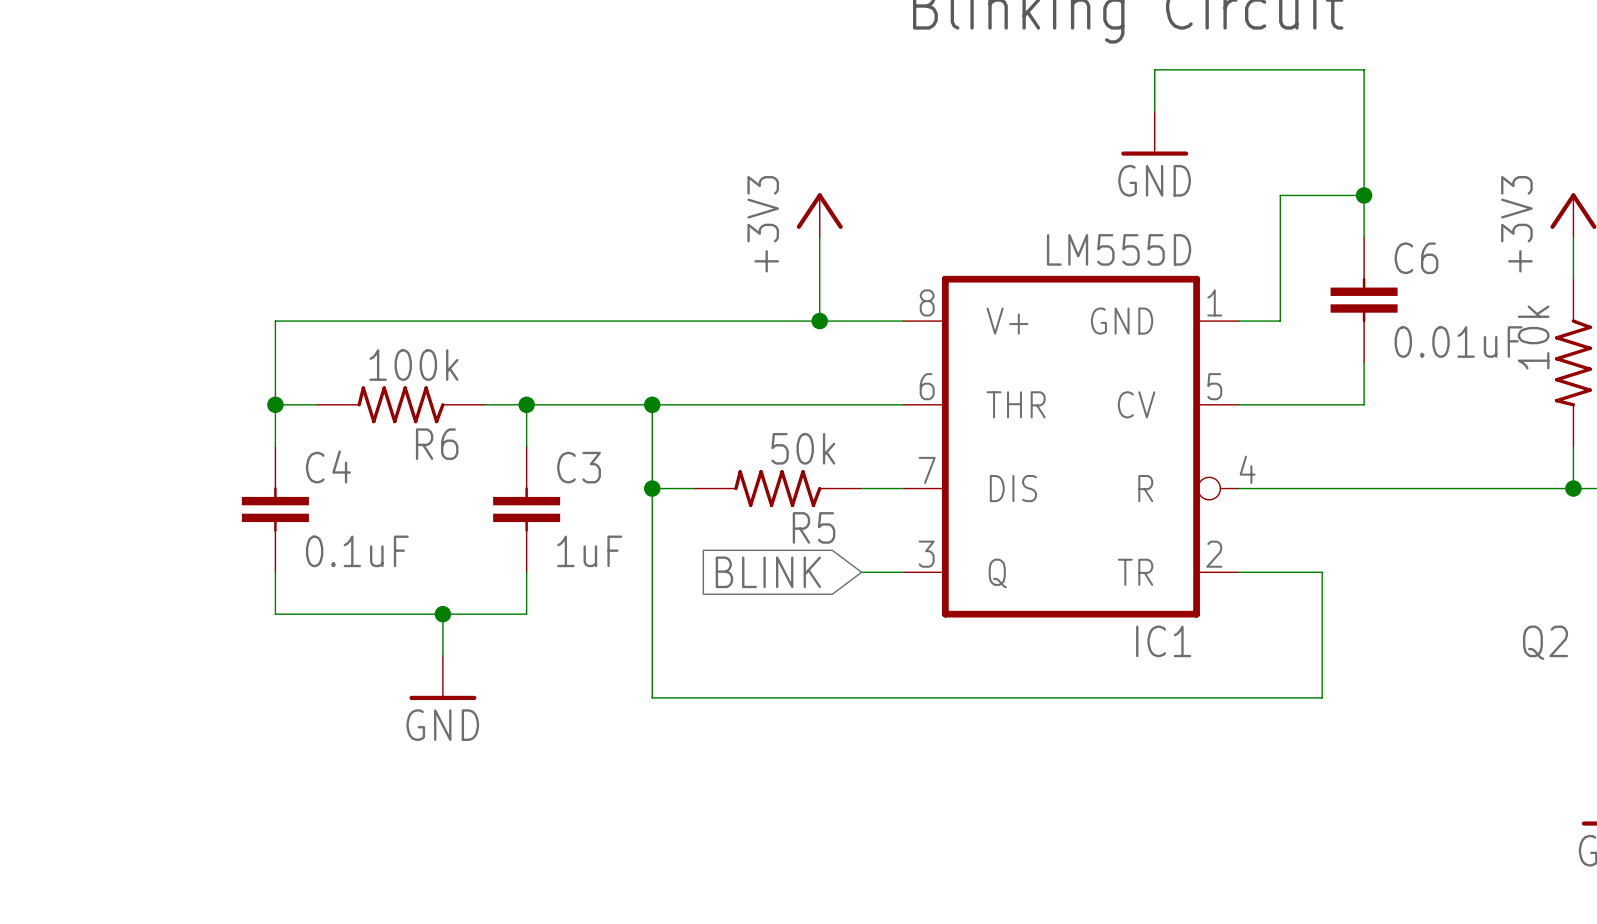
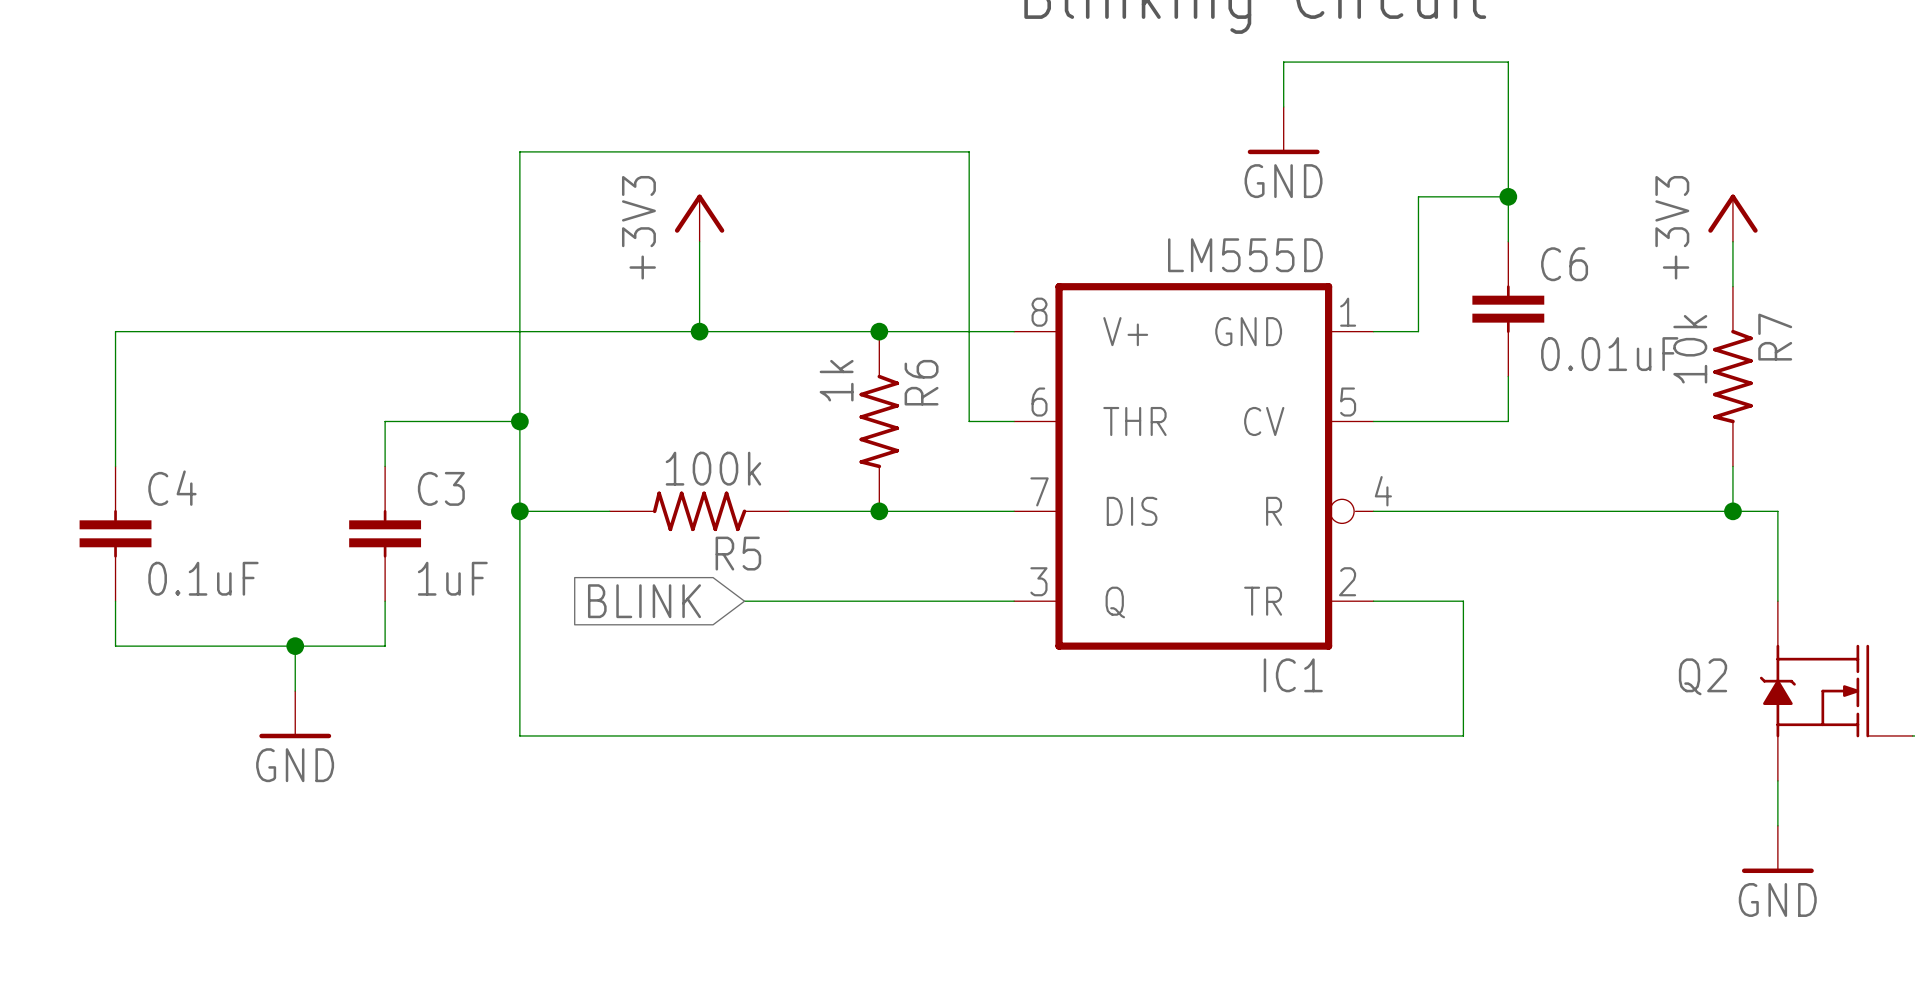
power symbol position: +3V3 (819, 215) -> +3V3 (699, 218)
wire: (819, 237) (819, 321) -> (699, 241) (699, 331)
wire: (275, 321) (275, 446) -> (340, 331) (115, 331) (115, 466)
junction: none -> (699, 331)
junction position: (819, 321) -> (879, 331)
R6 value: 100k (413, 365) -> 1k (836, 380)
wire: (275, 404) (317, 404) -> none
junction: (275, 404) -> none
R6 rotation: 0° (401, 404) -> 90° counterclockwise (879, 421)
R6 position: (401, 404) -> (879, 421)
wire: none -> (519, 421) (385, 421) (385, 466)
junction: none -> (519, 421)
wire: (484, 404) (861, 404) -> (519, 646) (519, 151) (969, 151) (969, 421)
wire: (526, 404) (526, 446) -> (295, 646) (295, 691)
junction: (526, 404) -> none
wire: (652, 404) (652, 697) -> (519, 691) (519, 735) (744, 735)
junction: (652, 404) -> none
R5 value: 50k (803, 448) -> 100k (713, 468)
wire: none -> (519, 511) (609, 511)
junction: none -> (519, 511)
junction: (652, 488) -> none
R5 position: (777, 488) -> (699, 511)
junction: none -> (879, 511)
C4 position: (275, 509) -> (115, 533)
C3 position: (526, 509) -> (385, 533)
wire: (275, 572) (275, 614) -> (115, 601) (115, 646) (340, 646)
wire: (526, 572) (526, 614) (317, 614) -> (385, 601) (385, 646)
wire: none -> (744, 601) (969, 601)
global label position: BLINK (768, 572) -> BLINK (644, 601)
junction: none -> (295, 646)
junction: (442, 614) -> none
power symbol position: GND (442, 678) -> GND (295, 714)

